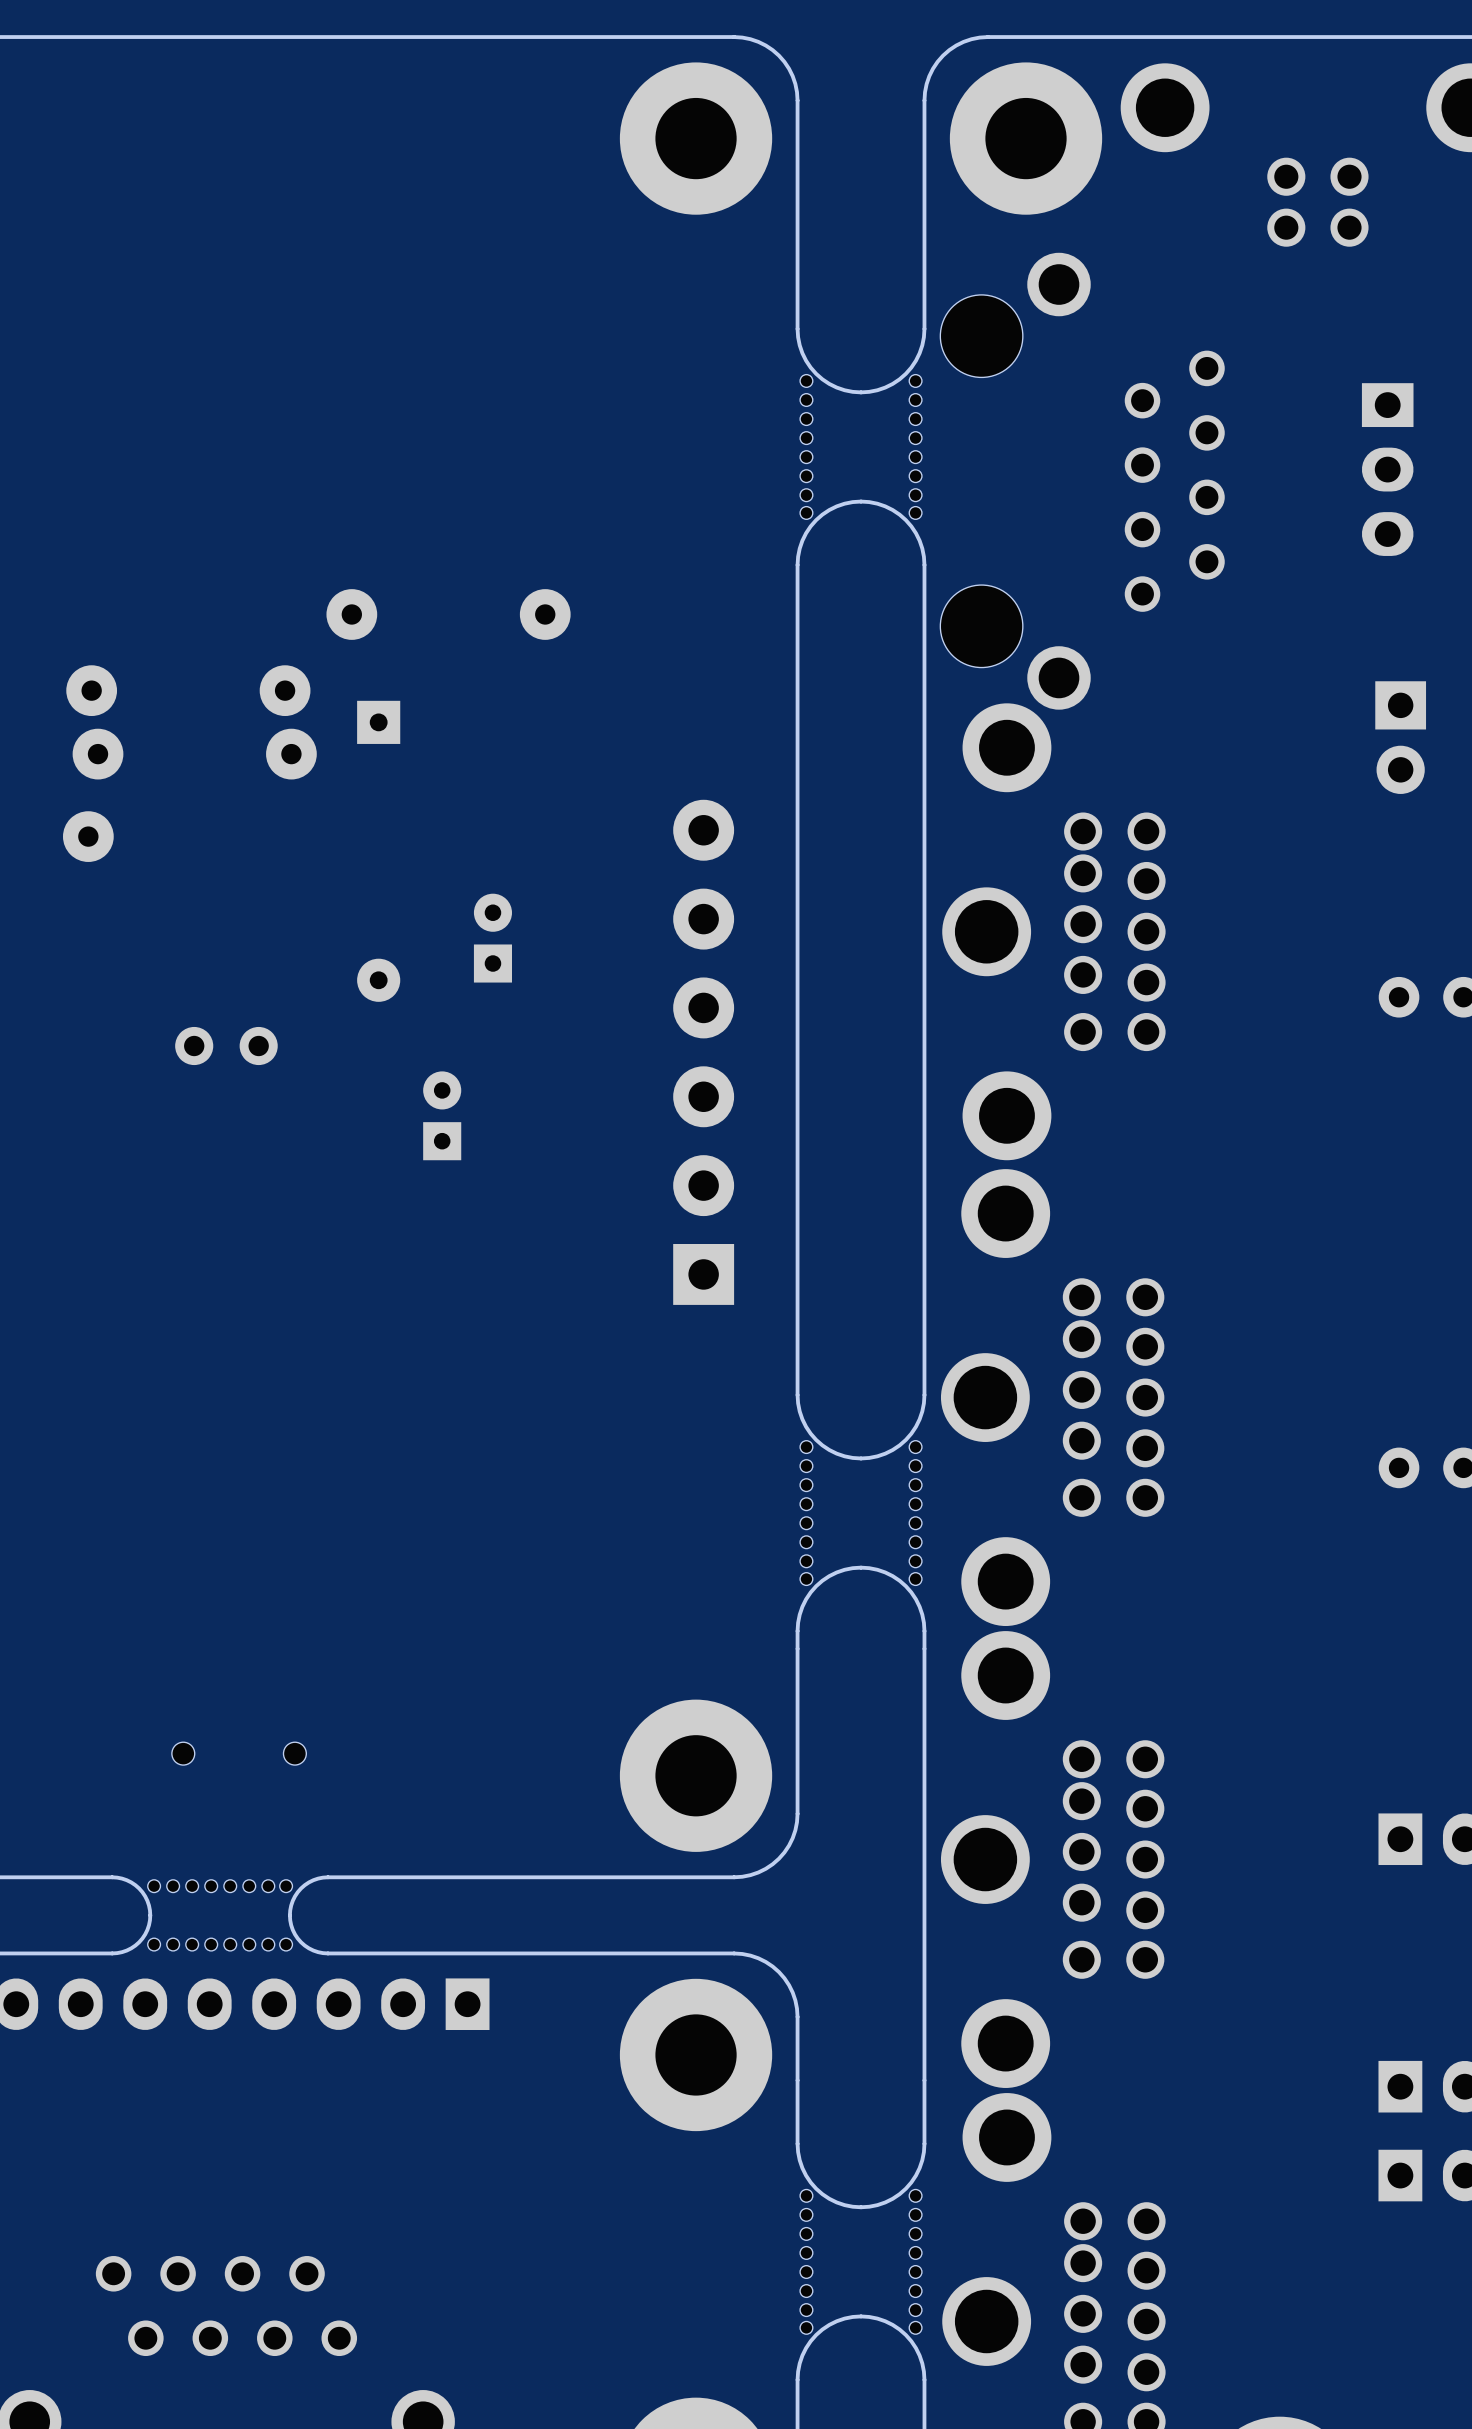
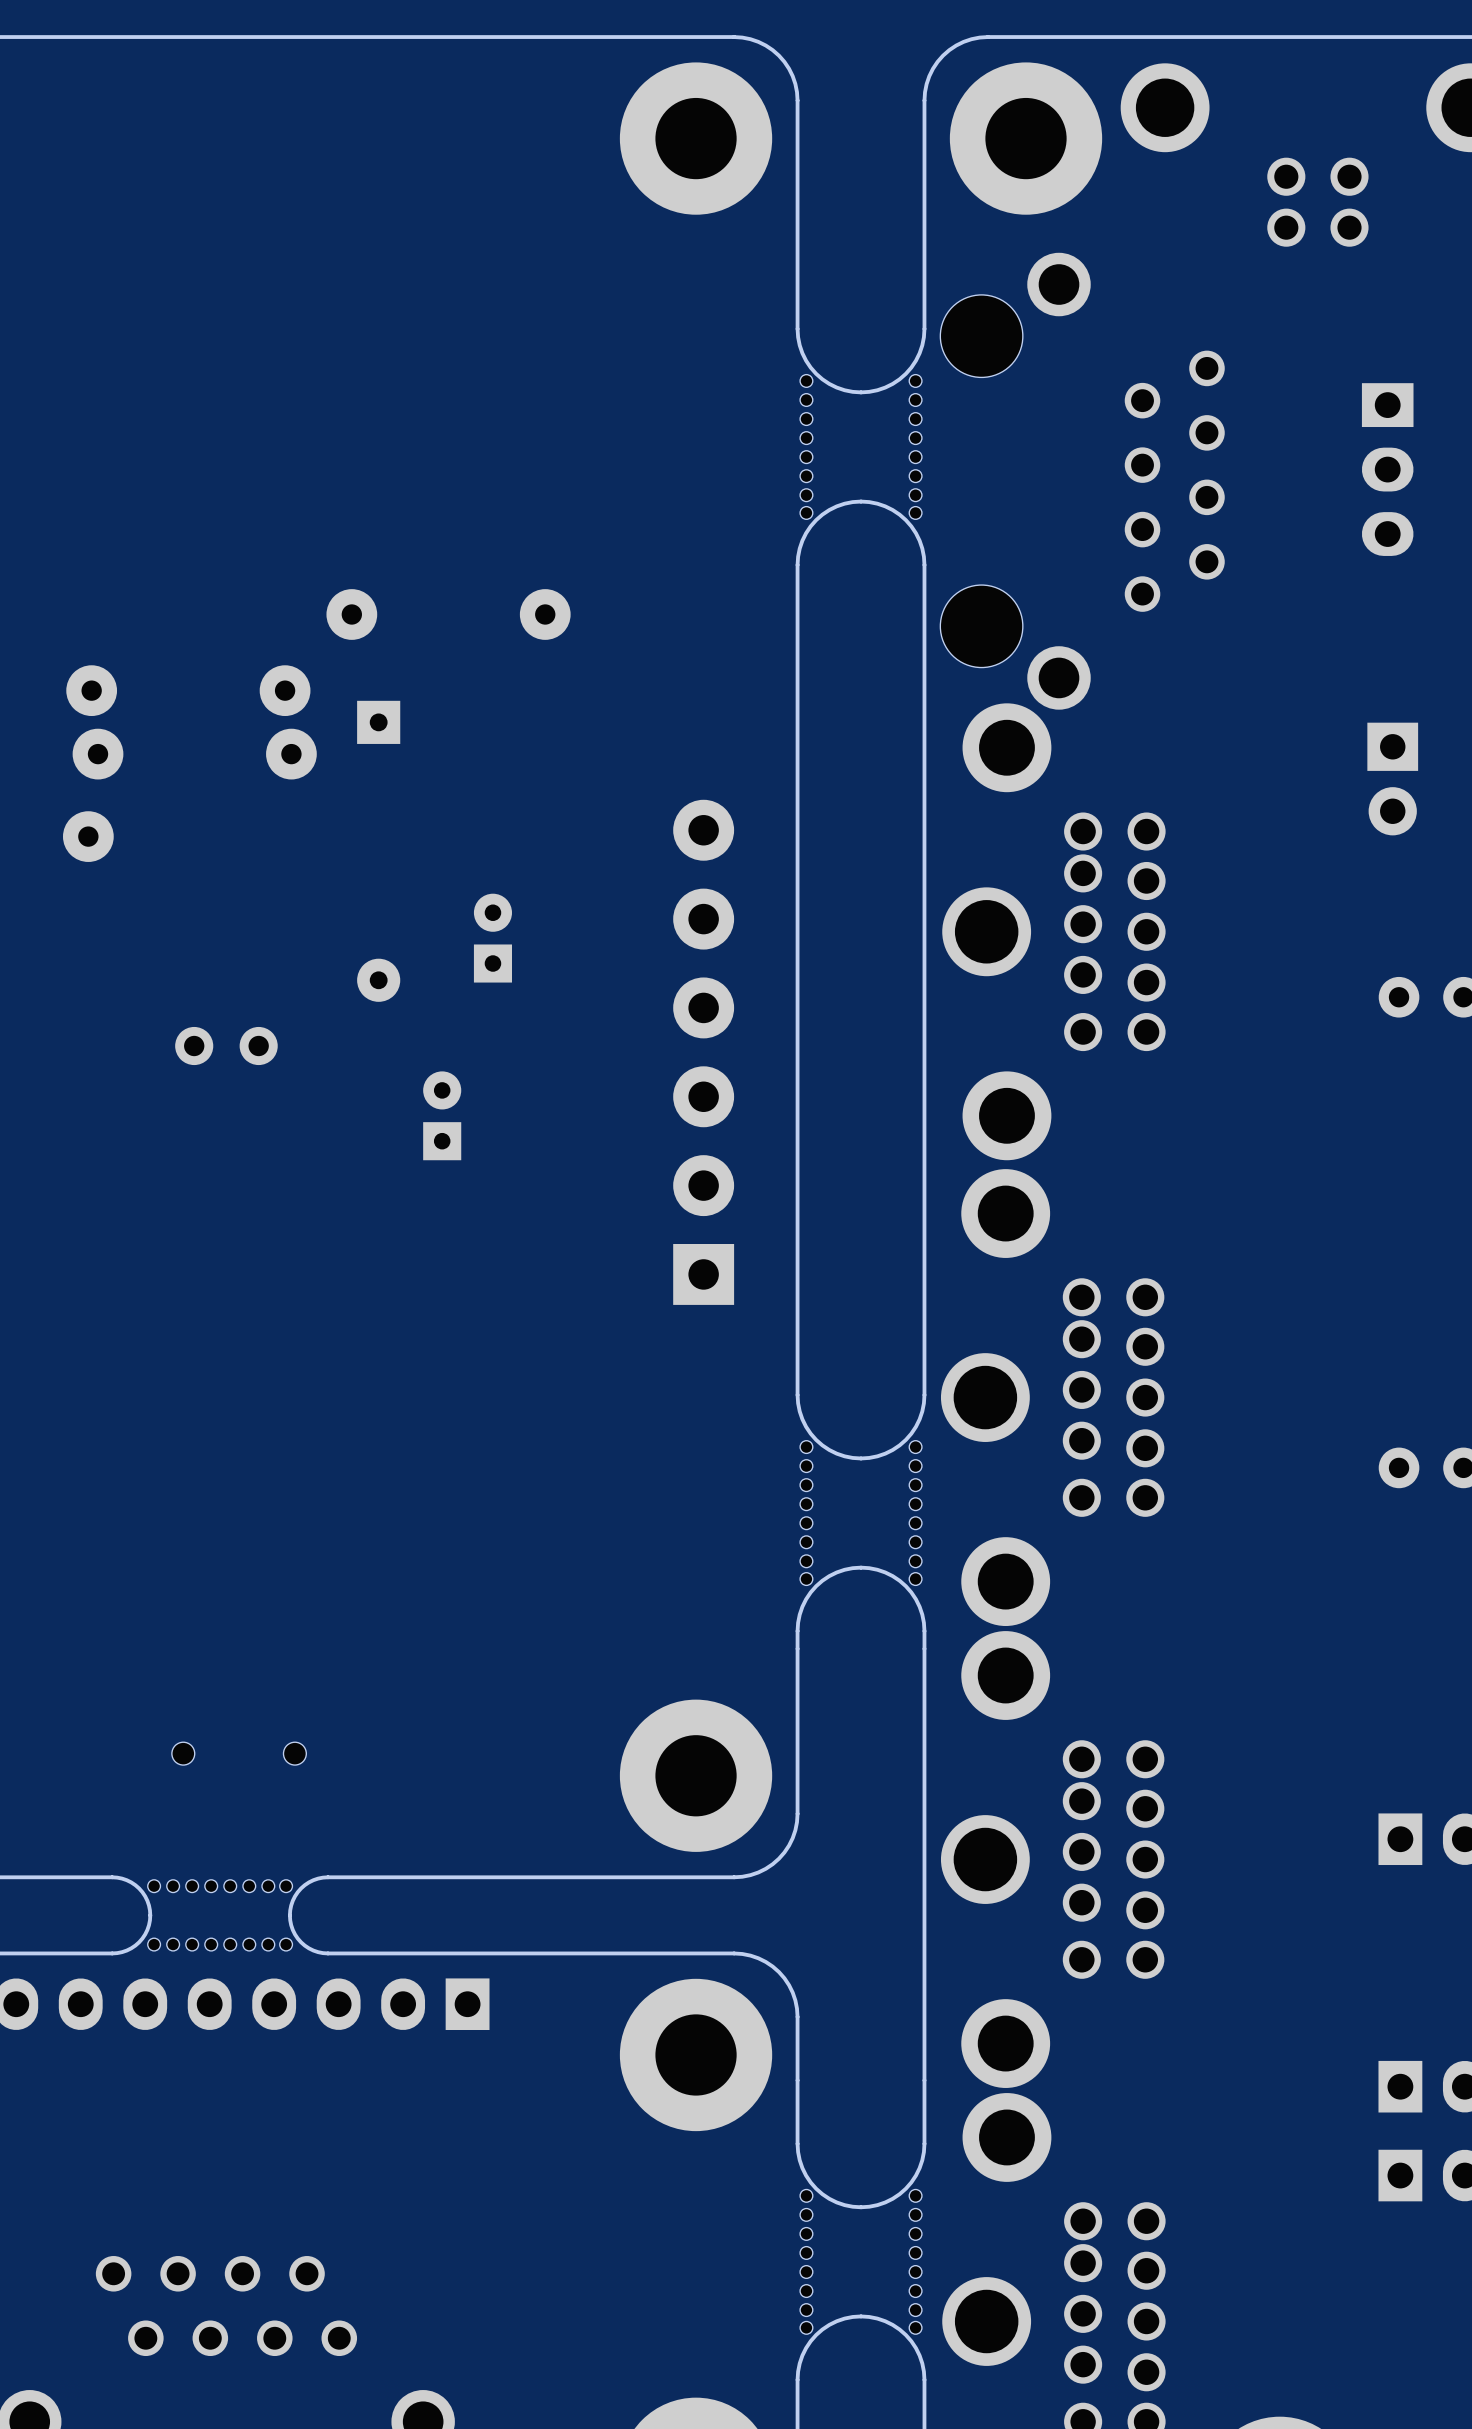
part position: (1400, 737) -> (1392, 779)

